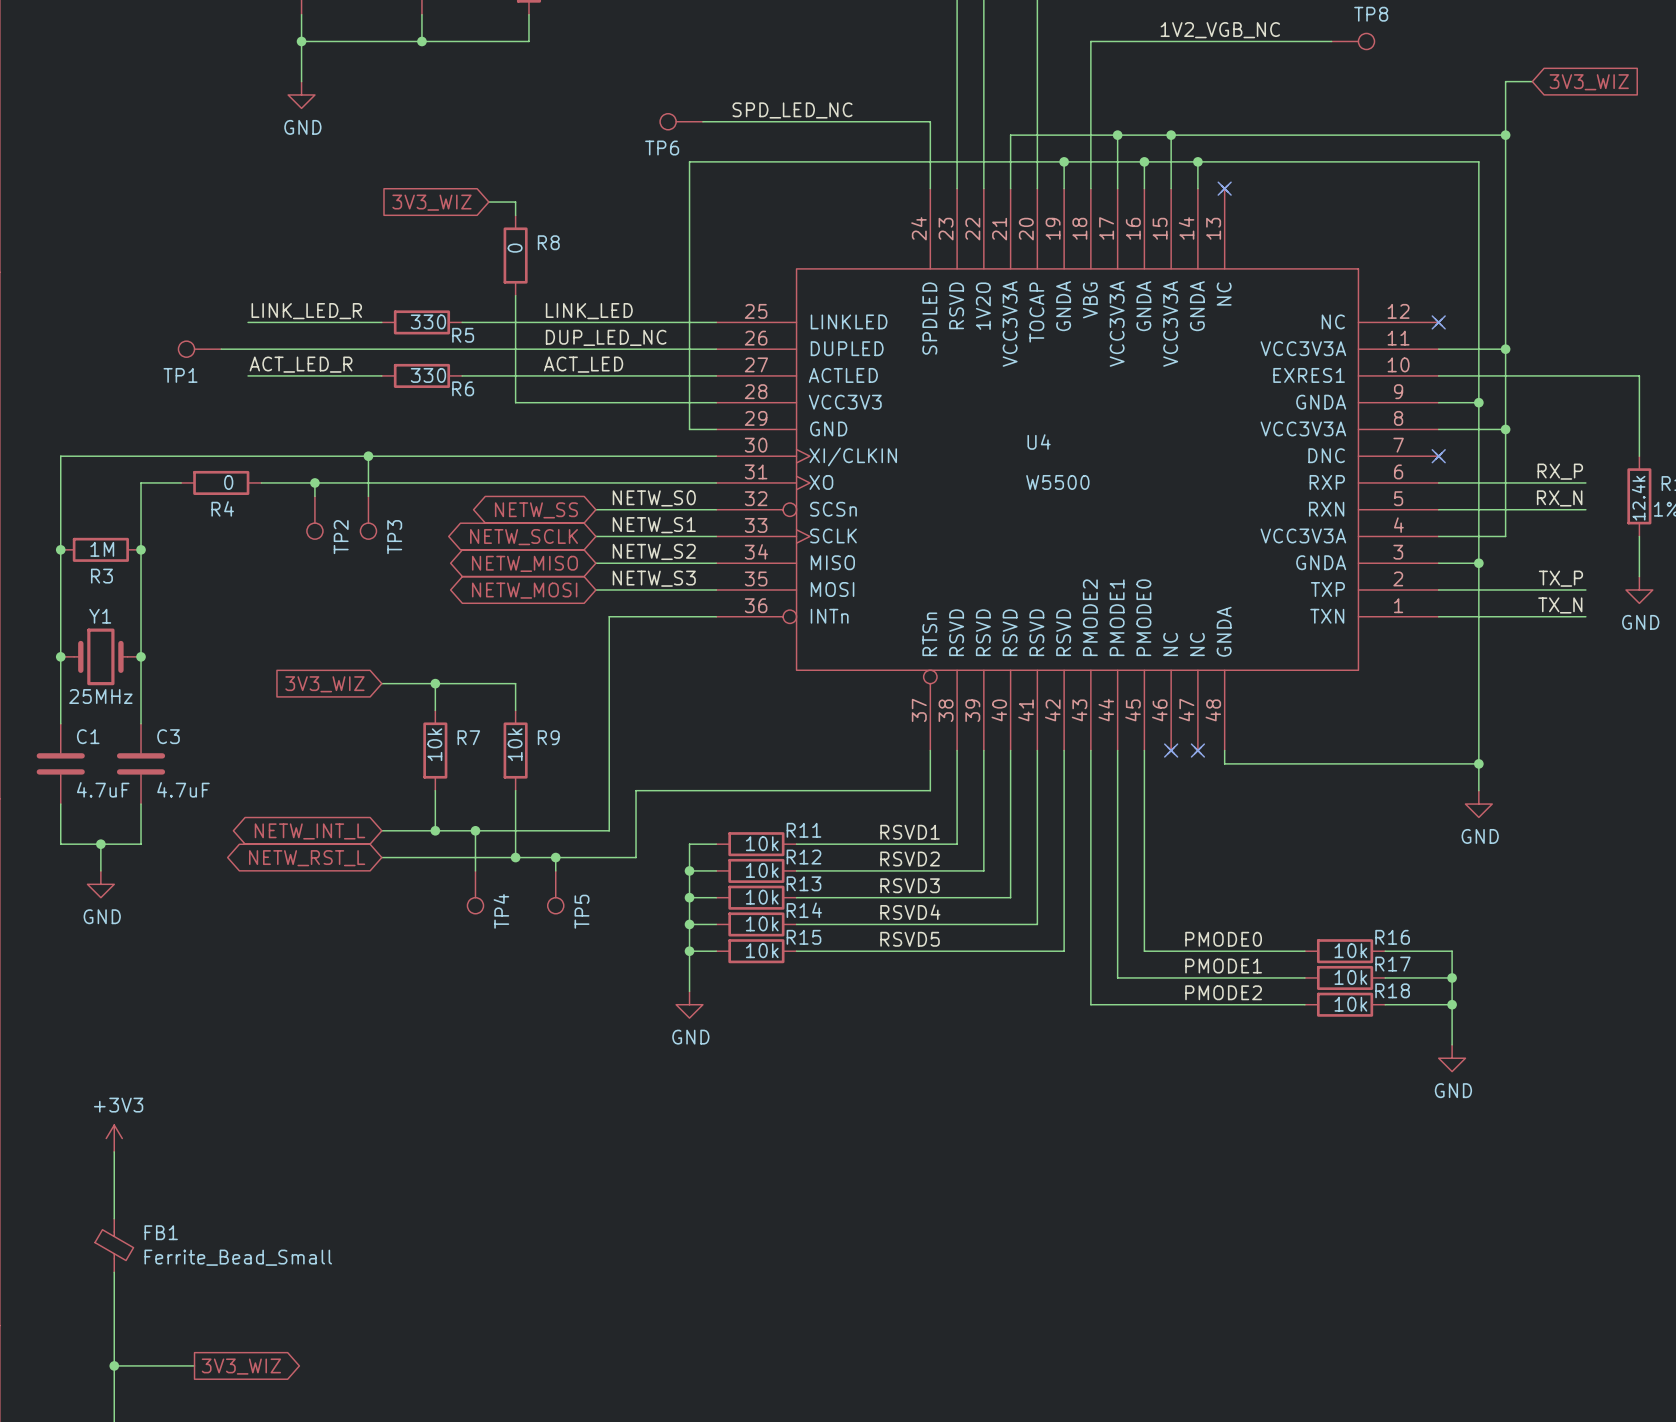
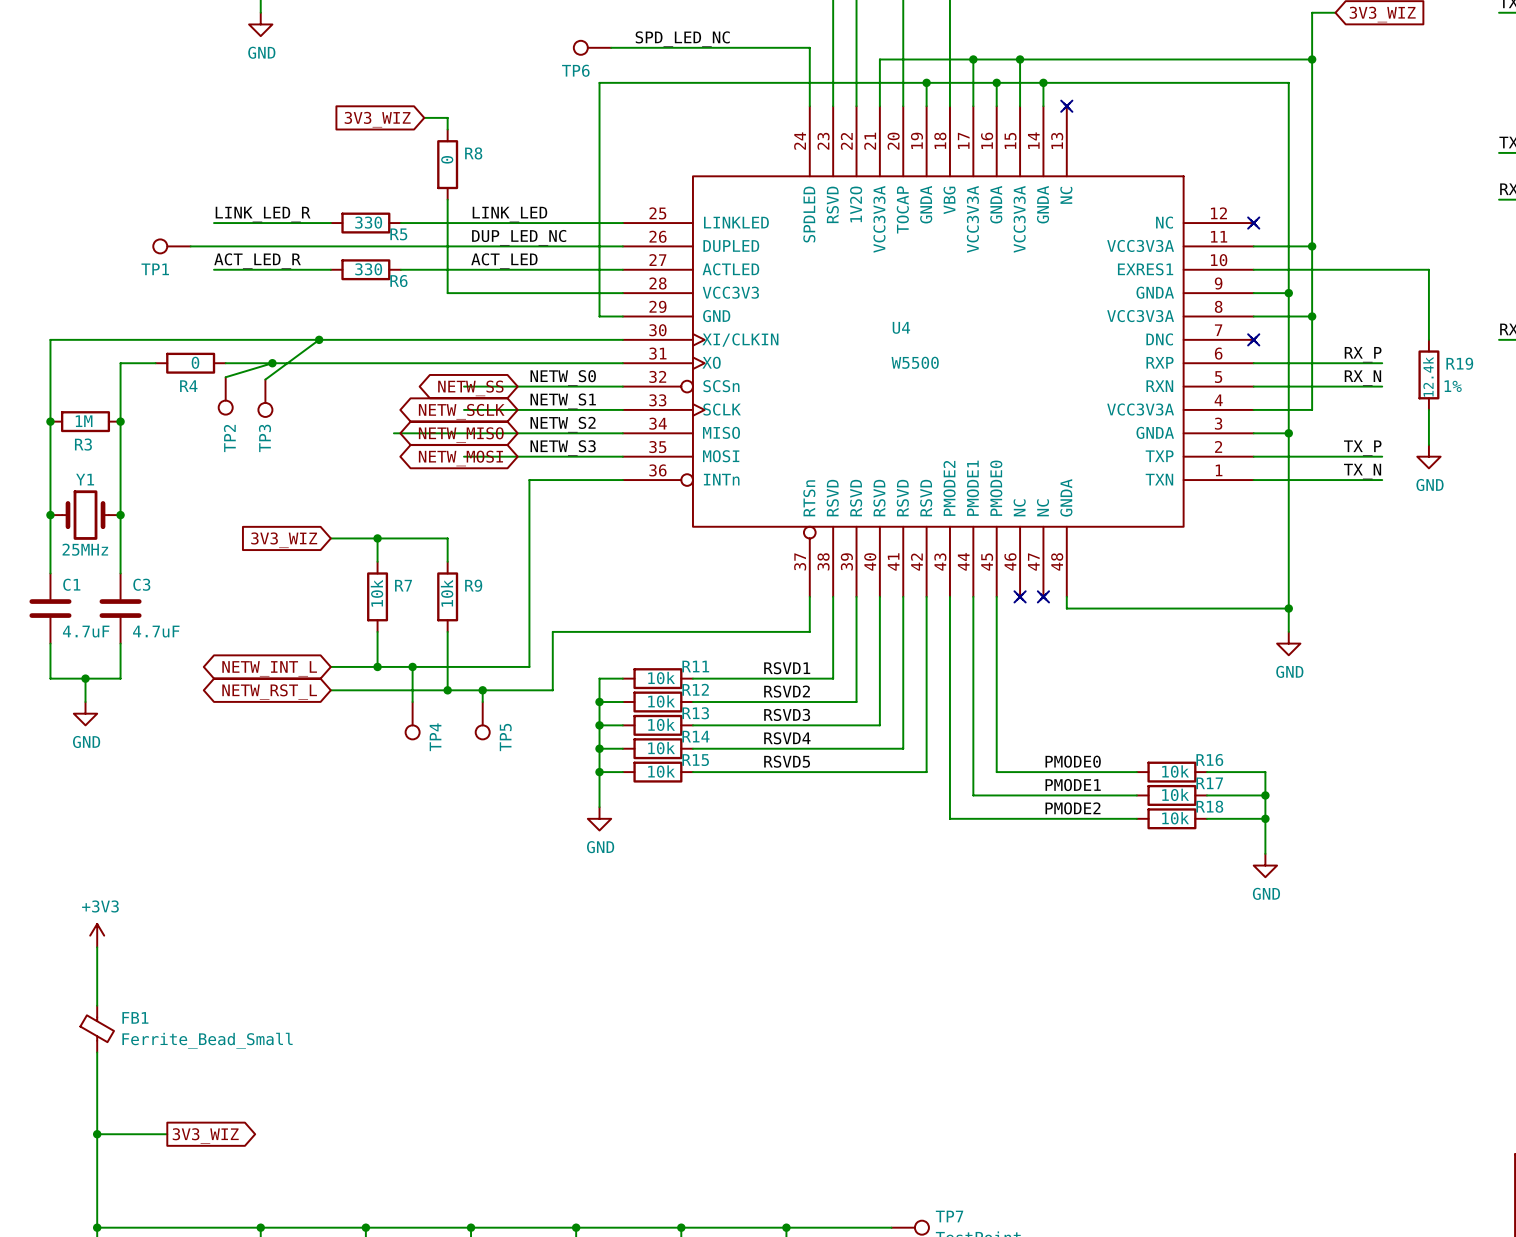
wire: (368, 456) (368, 496) -> (319, 339) (265, 379)
wire: (314, 482) (314, 496) -> (272, 363) (225, 377)
wire: none -> (464, 386) (517, 386)
TP2 position: (314, 517) -> (225, 395)
TP3 position: (368, 517) -> (265, 398)
wire: none -> (464, 409) (517, 409)
TP2 name position: TP2 (341, 537) -> TP2 (229, 438)
TP3 name position: TP3 (394, 537) -> TP3 (264, 438)
wire: none -> (393, 433) (517, 433)
wire: none -> (464, 456) (517, 456)

